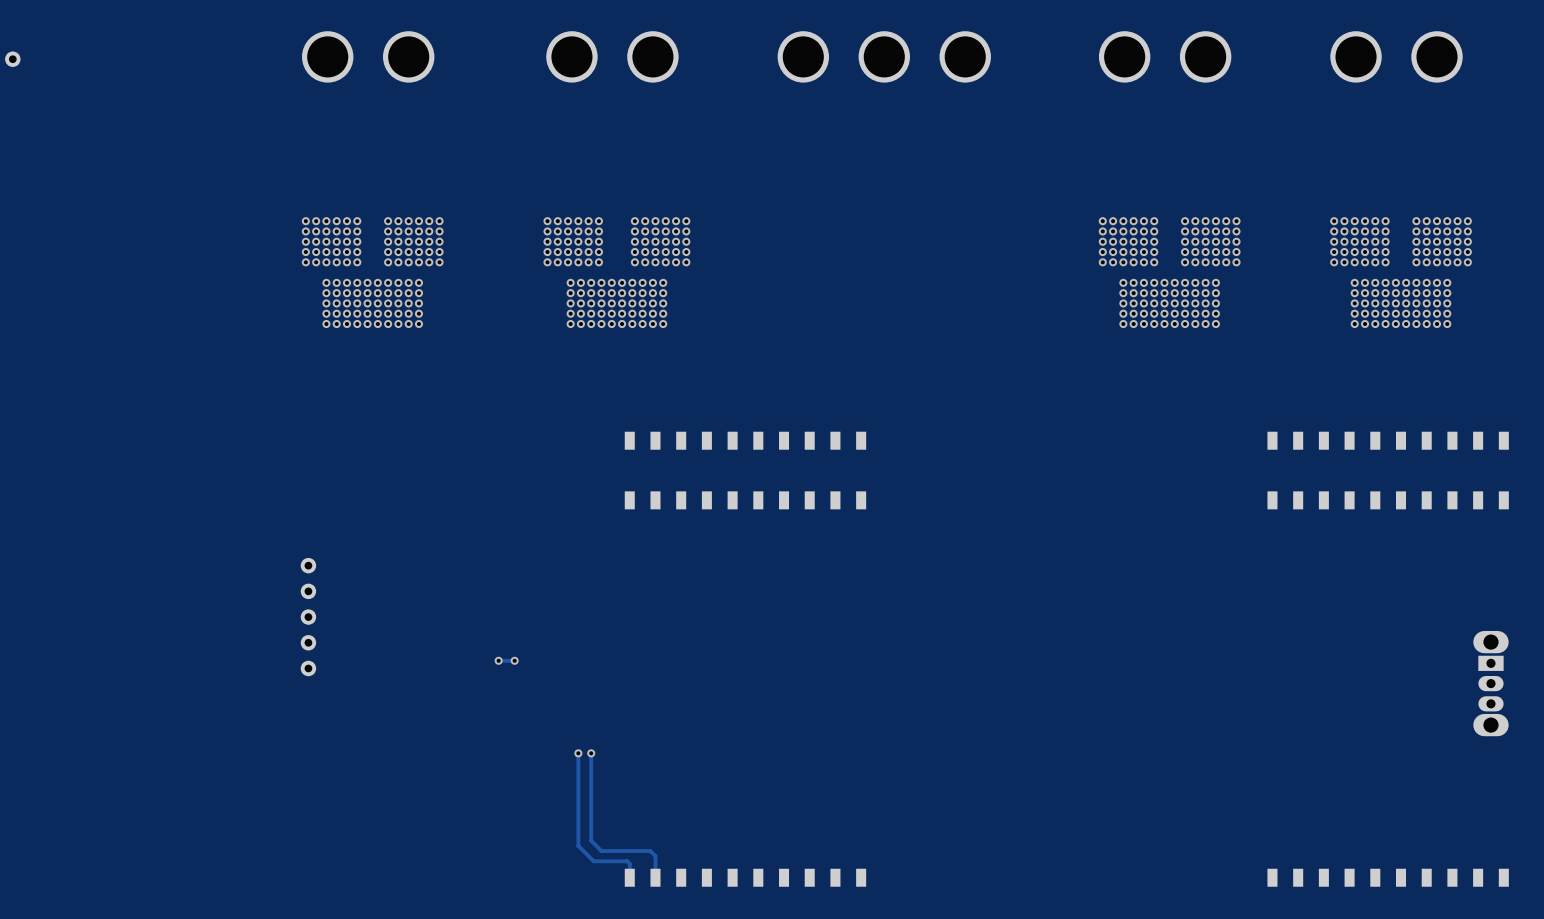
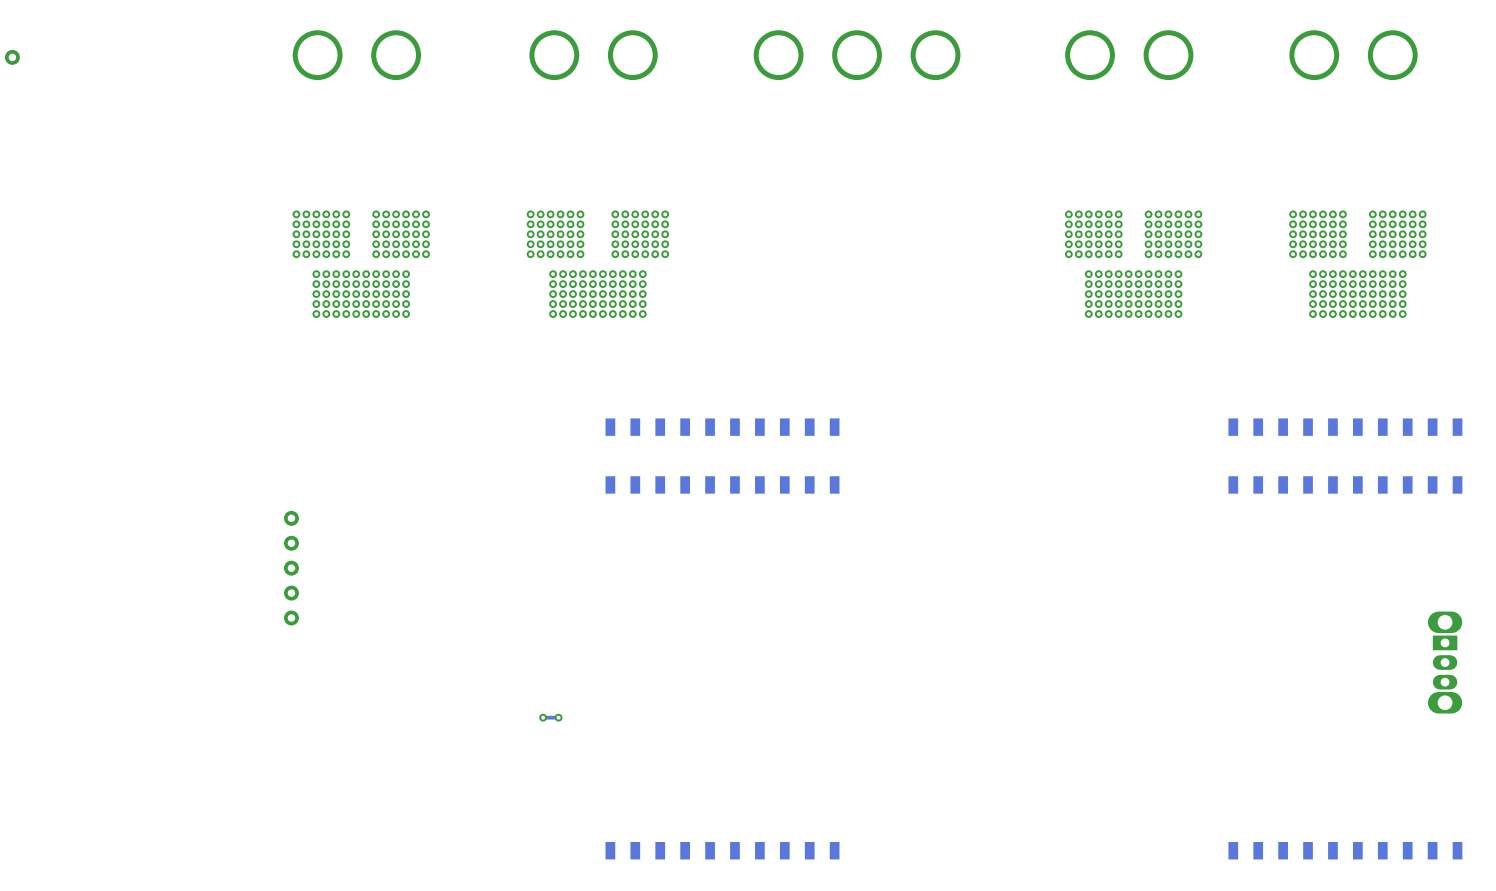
part position: (308, 617) -> (291, 568)
via: (498, 660) -> none
track: (514, 660) (498, 660) -> (558, 717) (543, 717)
via: (514, 660) -> none
via: none -> (543, 717)
via: none -> (558, 717)
track: (578, 753) (578, 845) (593, 861) (627, 861) (629, 863) (629, 877) -> none
via: (578, 753) -> none
track: (591, 753) (591, 840) (601, 851) (650, 851) (655, 856) (655, 877) -> none
via: (591, 753) -> none

